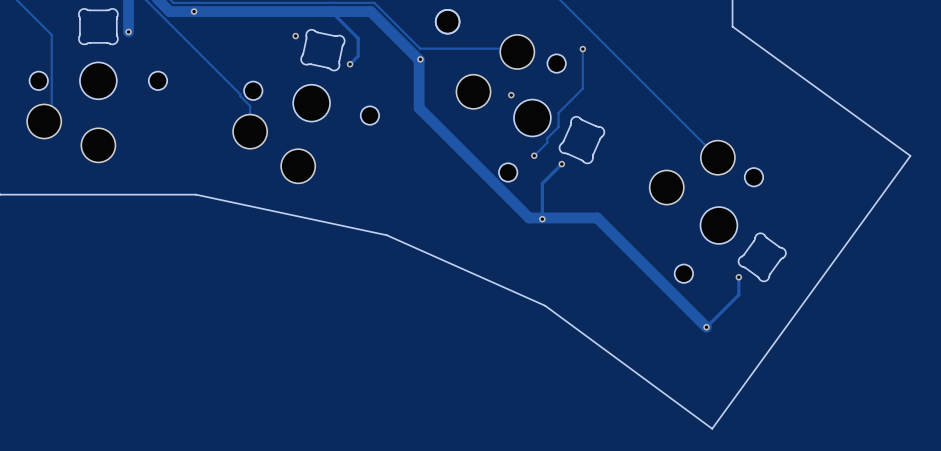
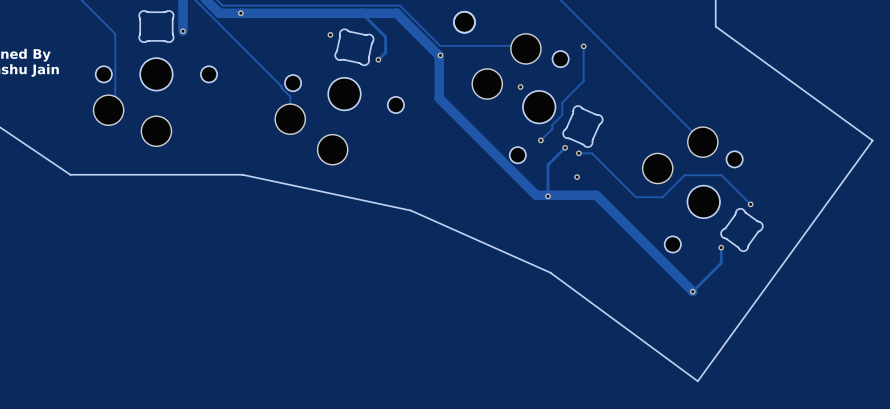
track: none -> (578, 153) (592, 153) (635, 197) (662, 197) (684, 175) (721, 175) (750, 204)
via: none -> (578, 153)
via: none -> (577, 177)
via: none -> (750, 204)

